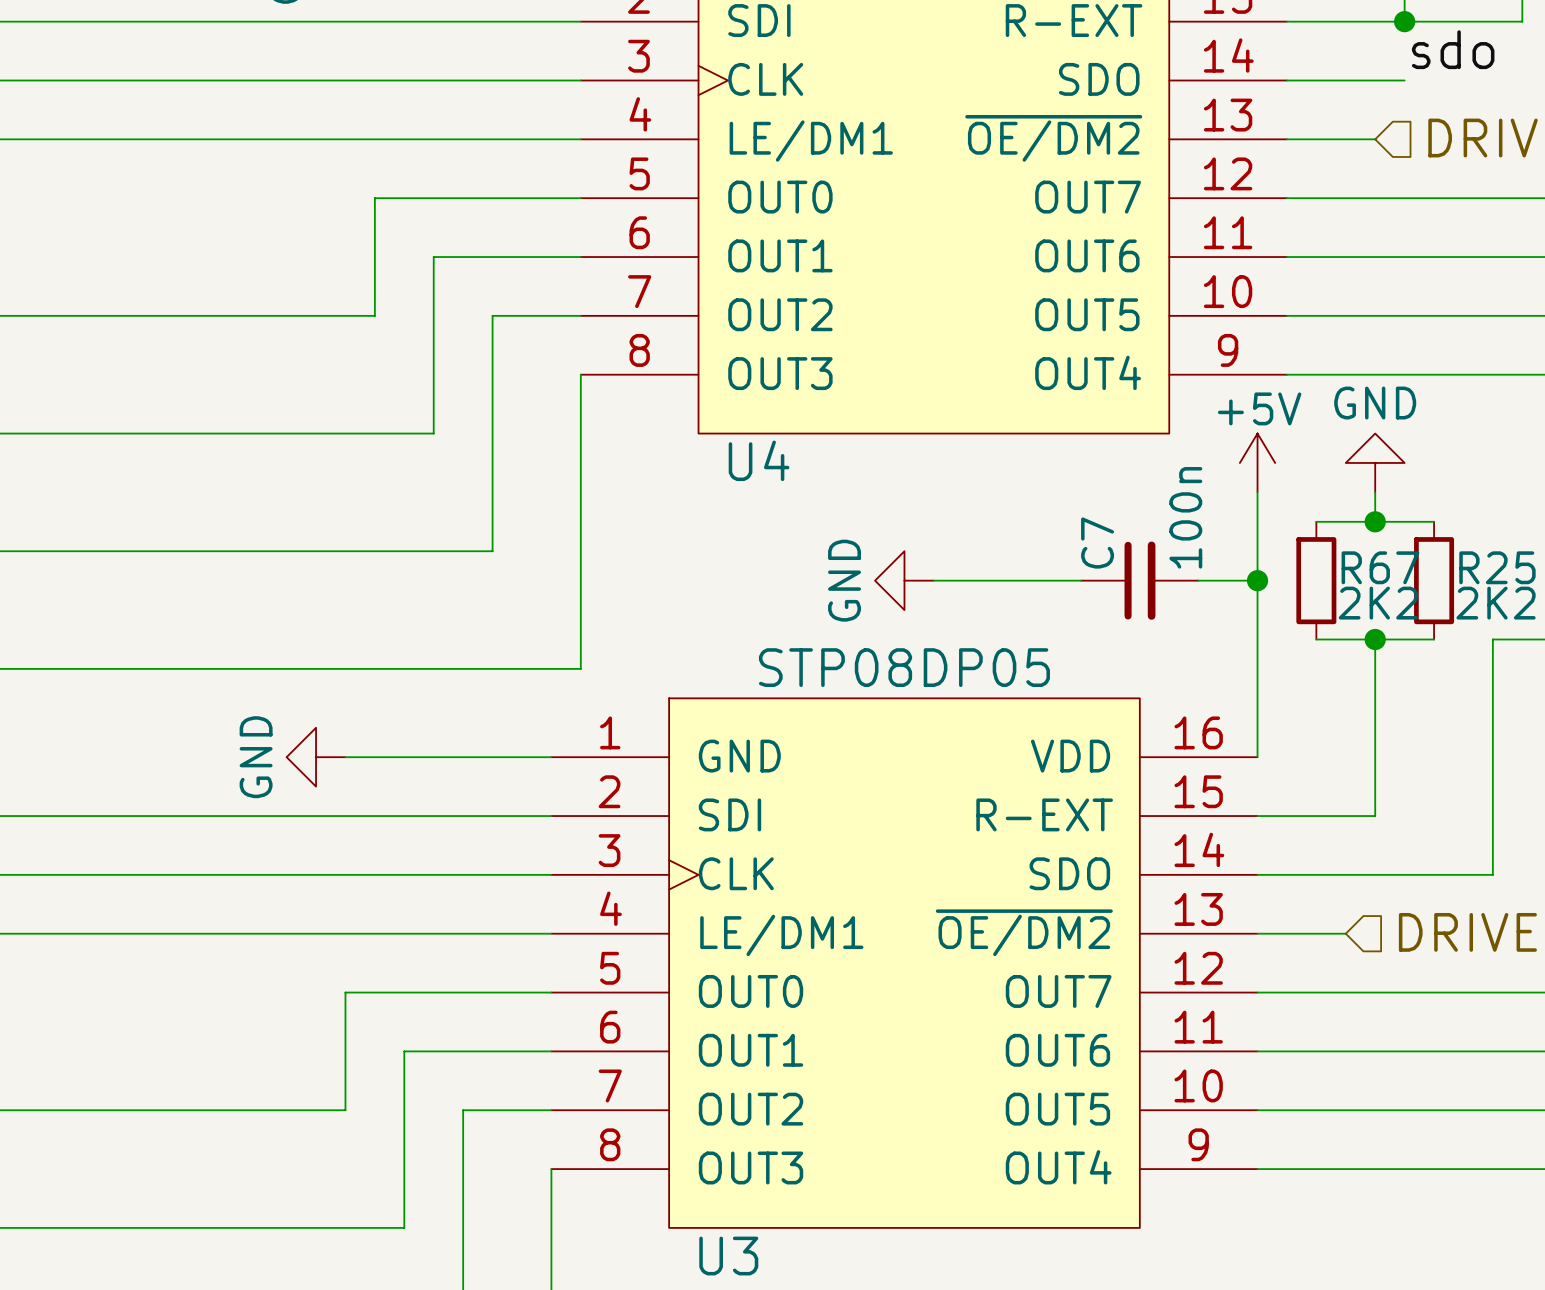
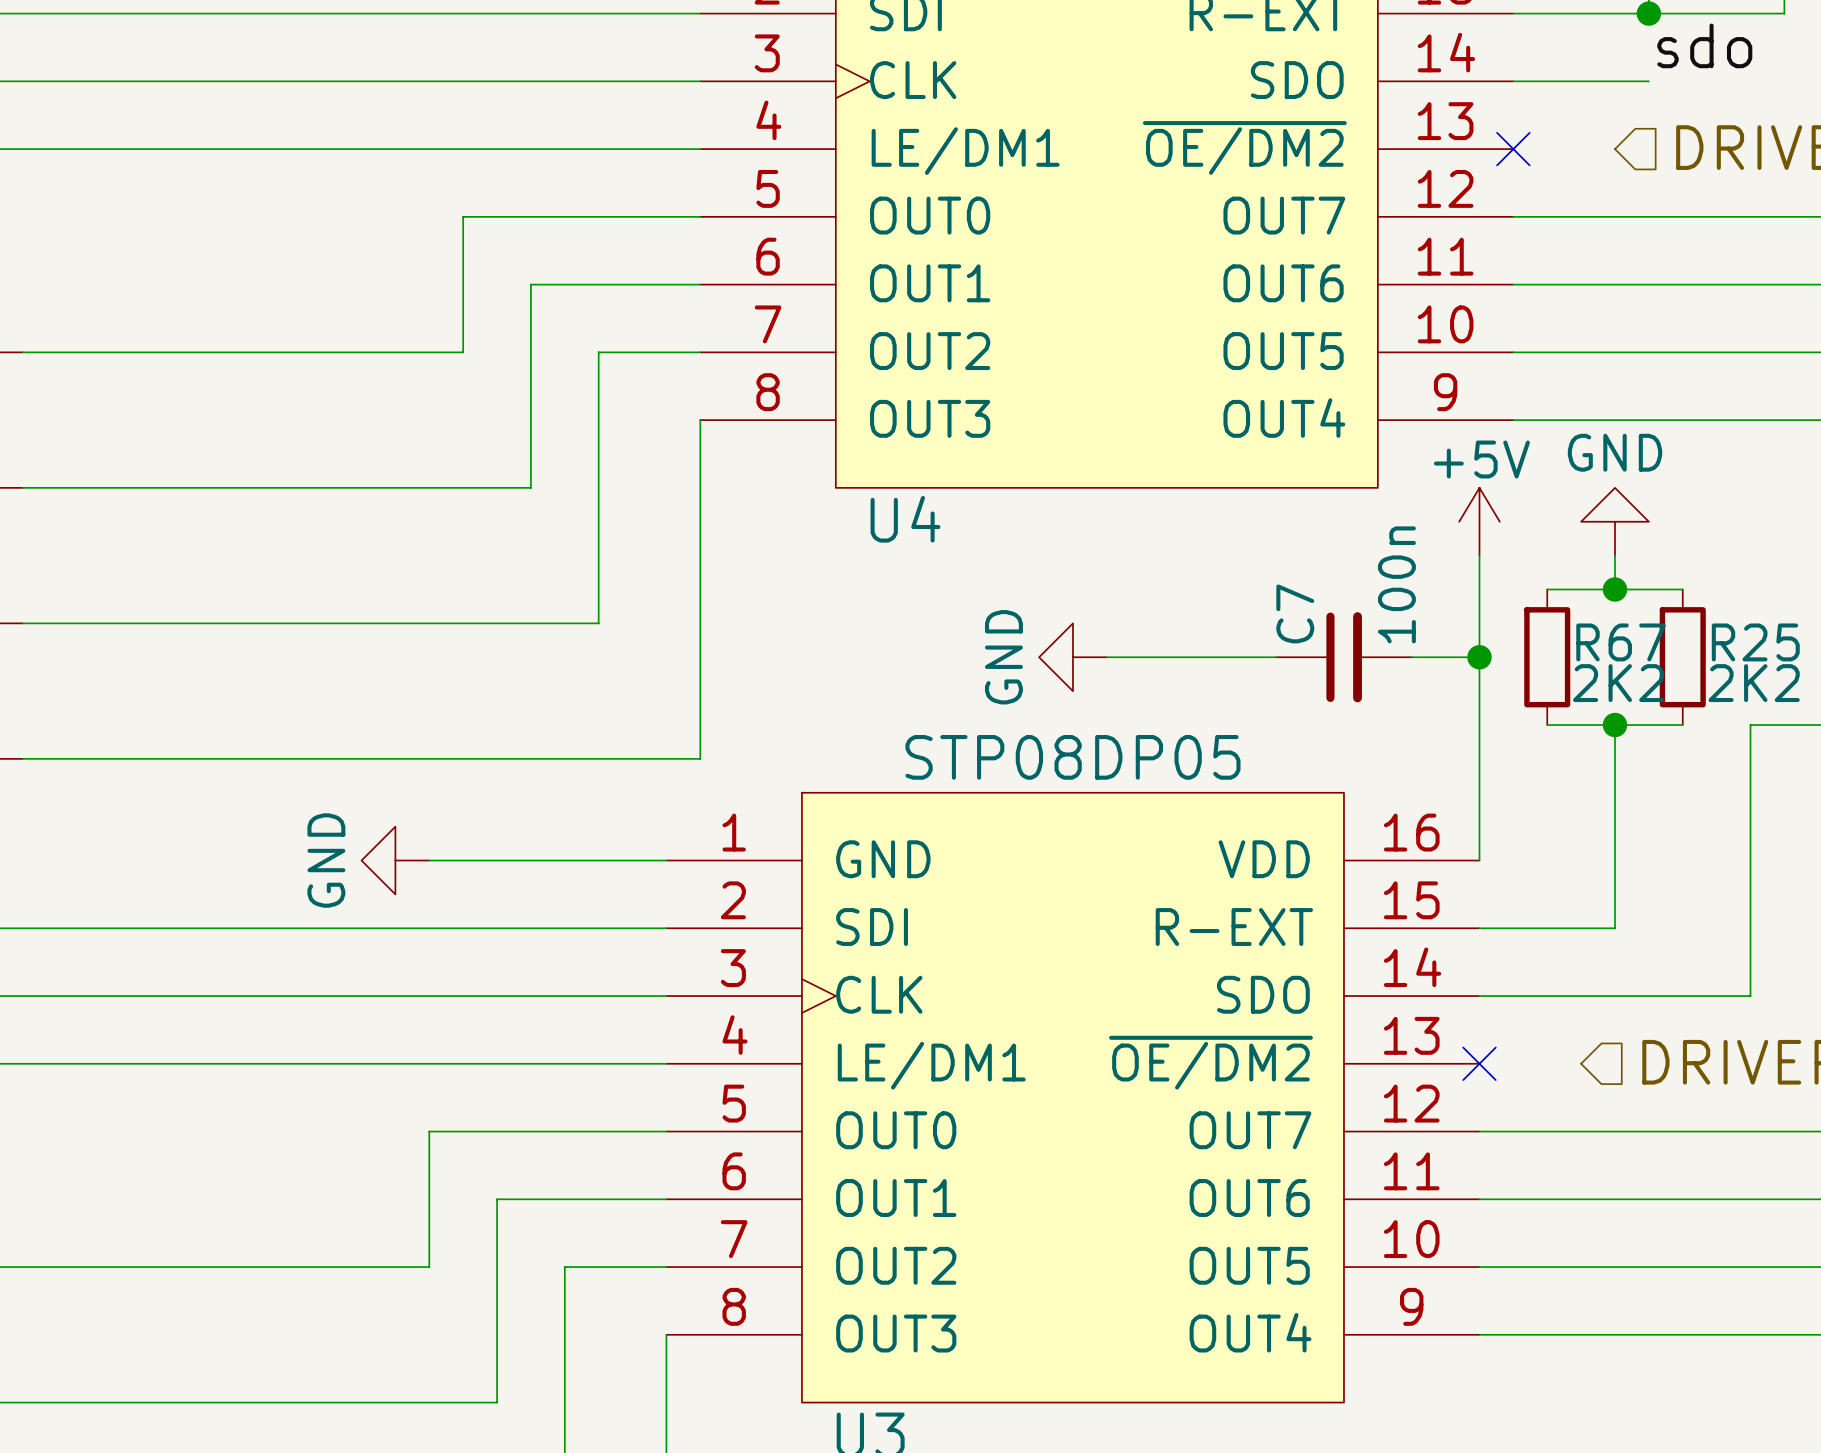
wire: (1286, 139) (1375, 139) -> none
no-connect mark: none -> (1513, 149)
wire: (1257, 933) (1345, 933) -> none
no-connect mark: none -> (1479, 1063)

